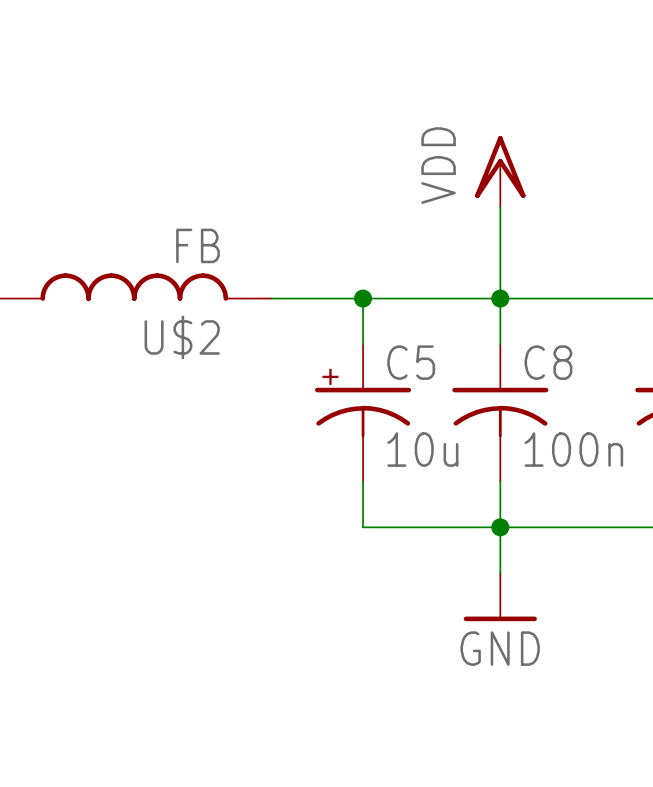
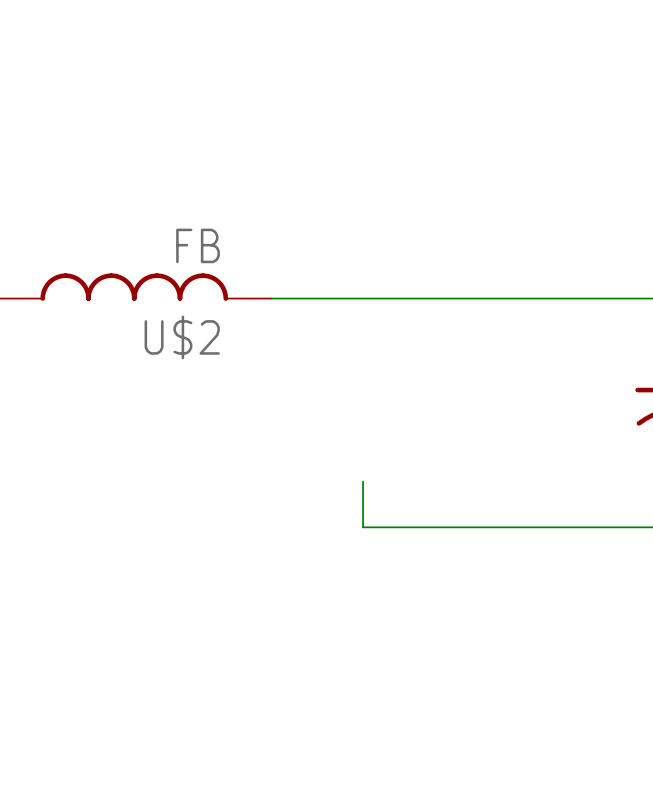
power symbol: VDD (500, 171) -> none
wire: (500, 207) (500, 344) -> none
wire: (363, 298) (363, 344) -> none
junction: (363, 298) -> none
junction: (500, 298) -> none
C5: 10u (363, 412) -> none
C8: 100n (500, 412) -> none
wire: (500, 481) (500, 573) -> none
junction: (500, 527) -> none
power symbol: GND (500, 597) -> none

